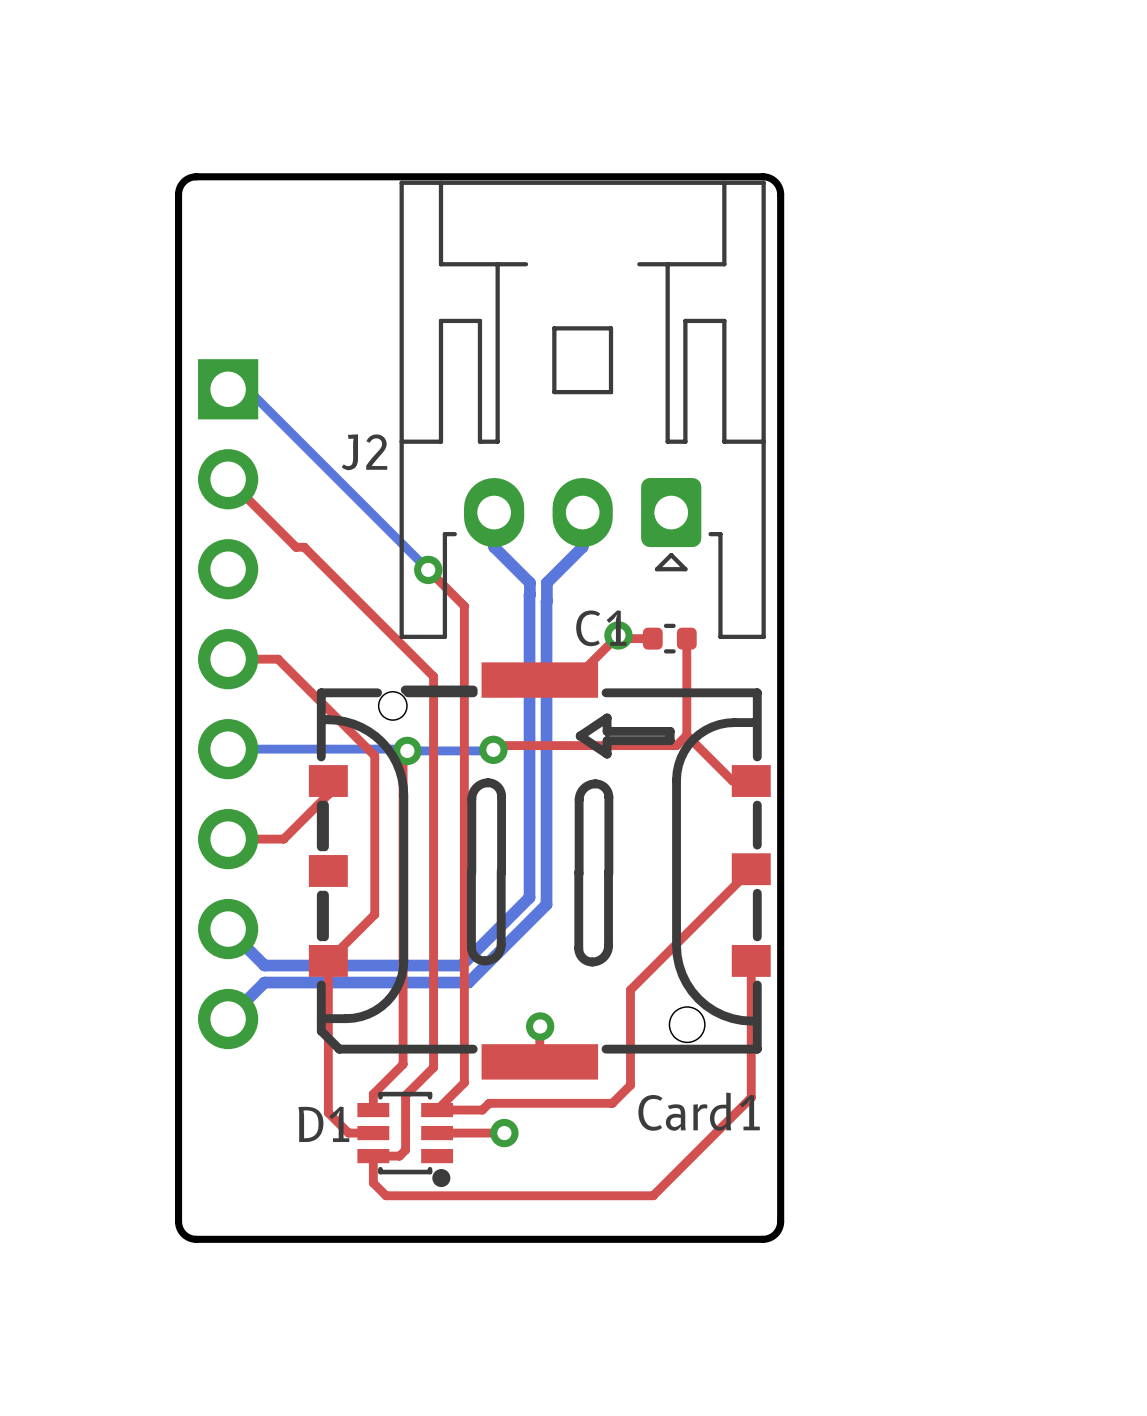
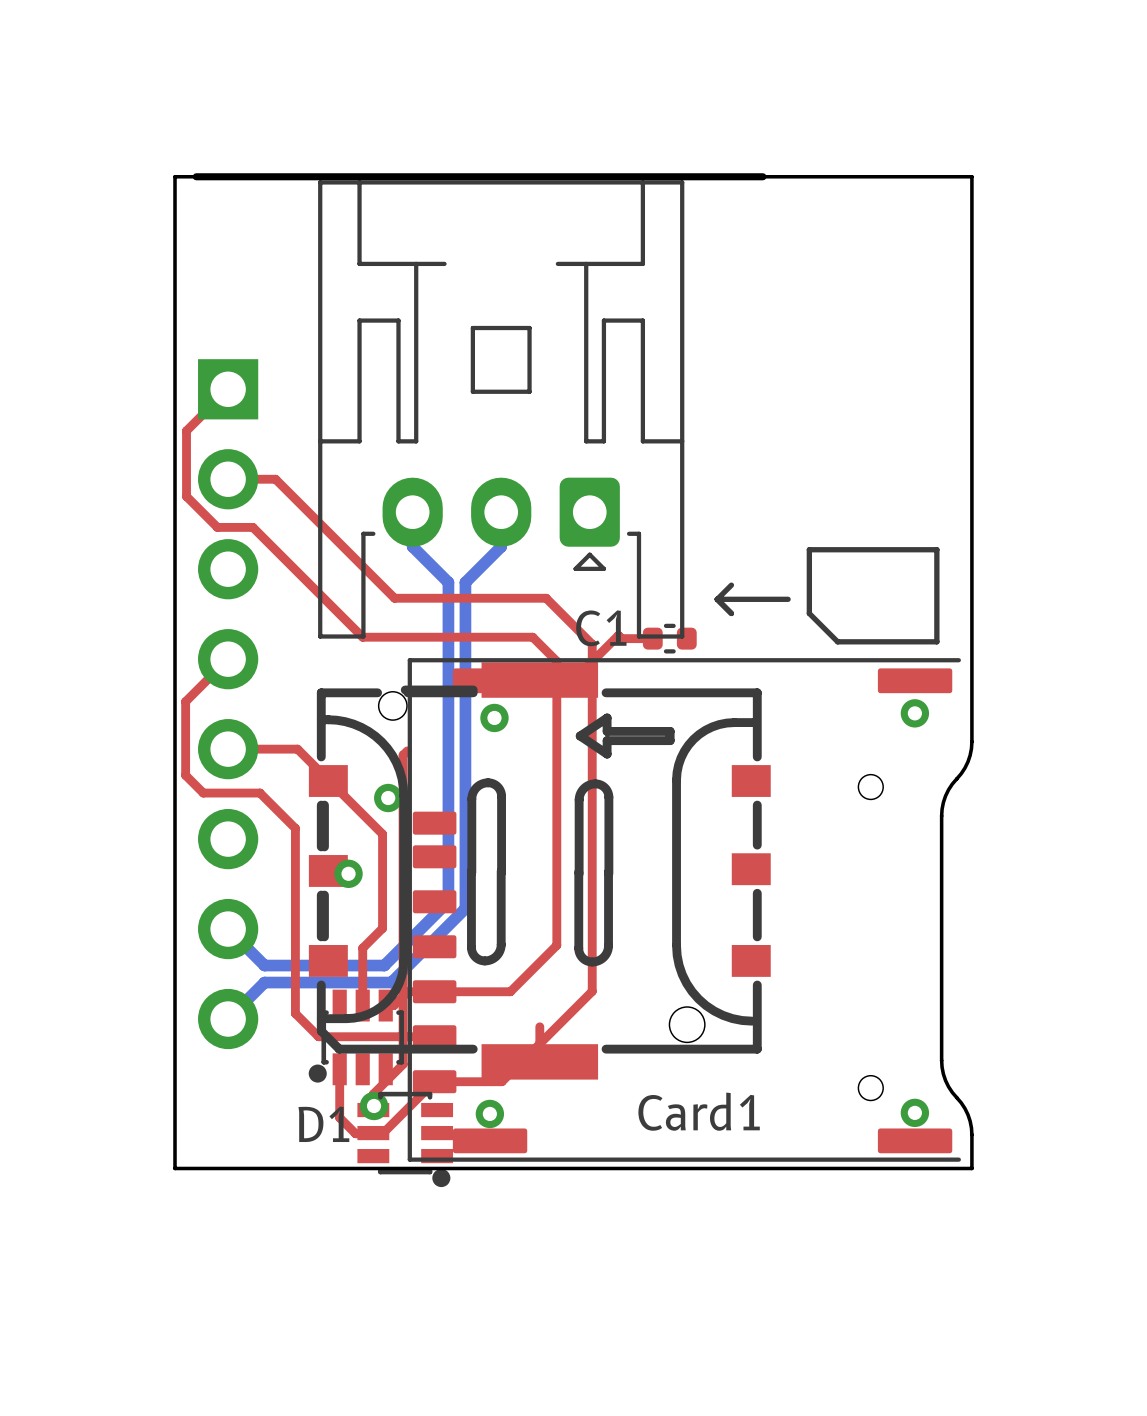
board edge: (196, 176) (183, 181) (178, 194) (178, 1221) (183, 1234) (196, 1239) (762, 1239) (771, 1236) (778, 1230) (780, 1221) (780, 194) (775, 181) (762, 176) -> (196, 176) (175, 176) (175, 1168) (971, 1168) (970, 1121) (965, 1108) (945, 1080) (941, 1060)
board edge: none -> (762, 176) (971, 176) (971, 741) (967, 761) (948, 789) (942, 809) (941, 1060)
top track: none -> (228, 389) (186, 430) (186, 496) (217, 527) (252, 527) (362, 637) (532, 637) (556, 661) (556, 945) (510, 991) (407, 991) (393, 1005) (385, 1005)
bottom track: (228, 389) (247, 389) (428, 569) -> none
part: none -> (501, 409)
J2: (582, 409) -> none
top track: (228, 479) (296, 547) (304, 547) (433, 676) (433, 1067) (405, 1095) (405, 1150) (399, 1156) (373, 1156) (373, 1183) (386, 1195) (653, 1195) (751, 1097) (751, 960) -> (228, 479) (275, 479) (394, 598) (546, 598) (592, 644) (592, 991) (501, 1081) (434, 1081) (382, 1133) (355, 1133) (339, 1117) (339, 1069)
bottom track: (494, 512) (494, 547) (529, 582) (529, 594) -> none
bottom track: (582, 512) (582, 547) (546, 582) (546, 601) -> none
line: none -> (809, 549) (936, 549) (936, 641) (837, 641) (809, 613) (809, 549)
top track: (428, 569) (464, 606) (464, 1082) (437, 1110) (482, 1110) (489, 1103) (612, 1103) (630, 1085) (630, 989) (751, 869) -> none
via: (428, 569) -> none
line: none -> (731, 585) (717, 599)
bottom track: (529, 594) (529, 897) (461, 965) (384, 965) -> (412, 512) (412, 546) (448, 582) (448, 901) (384, 965)
line: none -> (717, 599) (788, 599)
bottom track: (546, 601) (546, 904) (468, 982) (391, 982) -> (501, 512) (501, 546) (465, 582) (465, 908) (391, 982)
via: (618, 635) -> none
top track: (686, 638) (686, 735) -> none
top track: (228, 659) (278, 659) (374, 755) (374, 914) (328, 960) (328, 1112) (348, 1133) (373, 1133) -> (228, 659) (185, 701) (185, 775) (203, 793) (260, 793) (295, 828) (295, 1013) (318, 1036) (434, 1036)
via: none -> (914, 713)
top track: (686, 735) (676, 745) (497, 745) (493, 749) -> none
top track: (686, 735) (732, 781) (751, 781) -> none
top track: none -> (228, 749) (297, 749) (382, 834) (382, 928) (362, 948) (362, 1005)
bottom track: (228, 749) (493, 749) -> none
via position: (493, 749) -> (494, 717)
via: (407, 750) -> none
top track: (328, 781) (328, 794) (283, 839) (228, 839) -> none
via: none -> (388, 798)
via: none -> (348, 873)
part: none -> (684, 909)
via: (540, 1026) -> none
part: none -> (356, 1037)
via: none -> (374, 1106)
via: none -> (914, 1112)
top track: (437, 1133) (504, 1133) -> none
via position: (504, 1133) -> (489, 1113)

